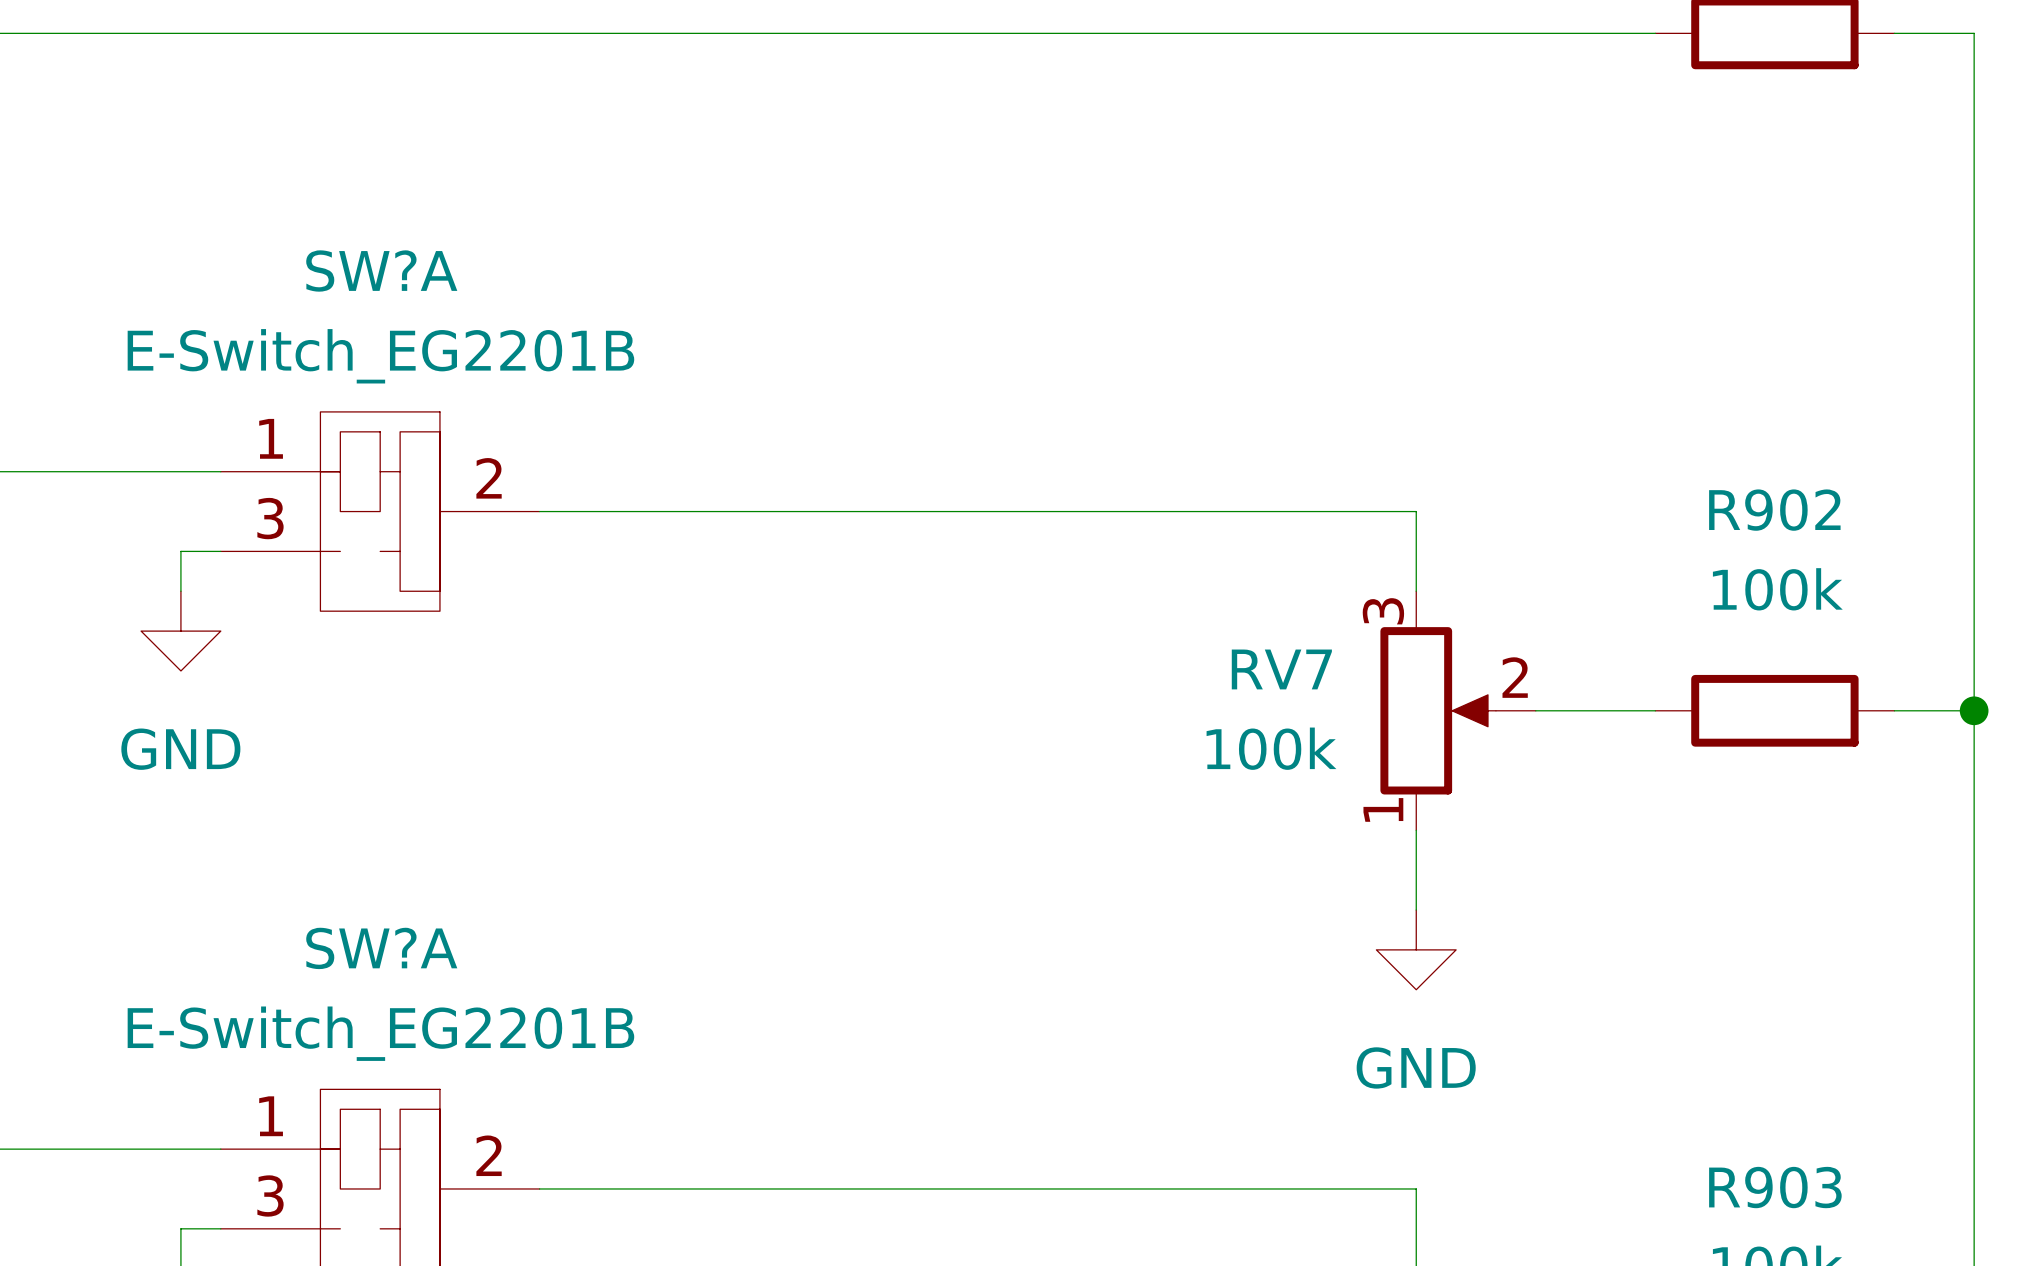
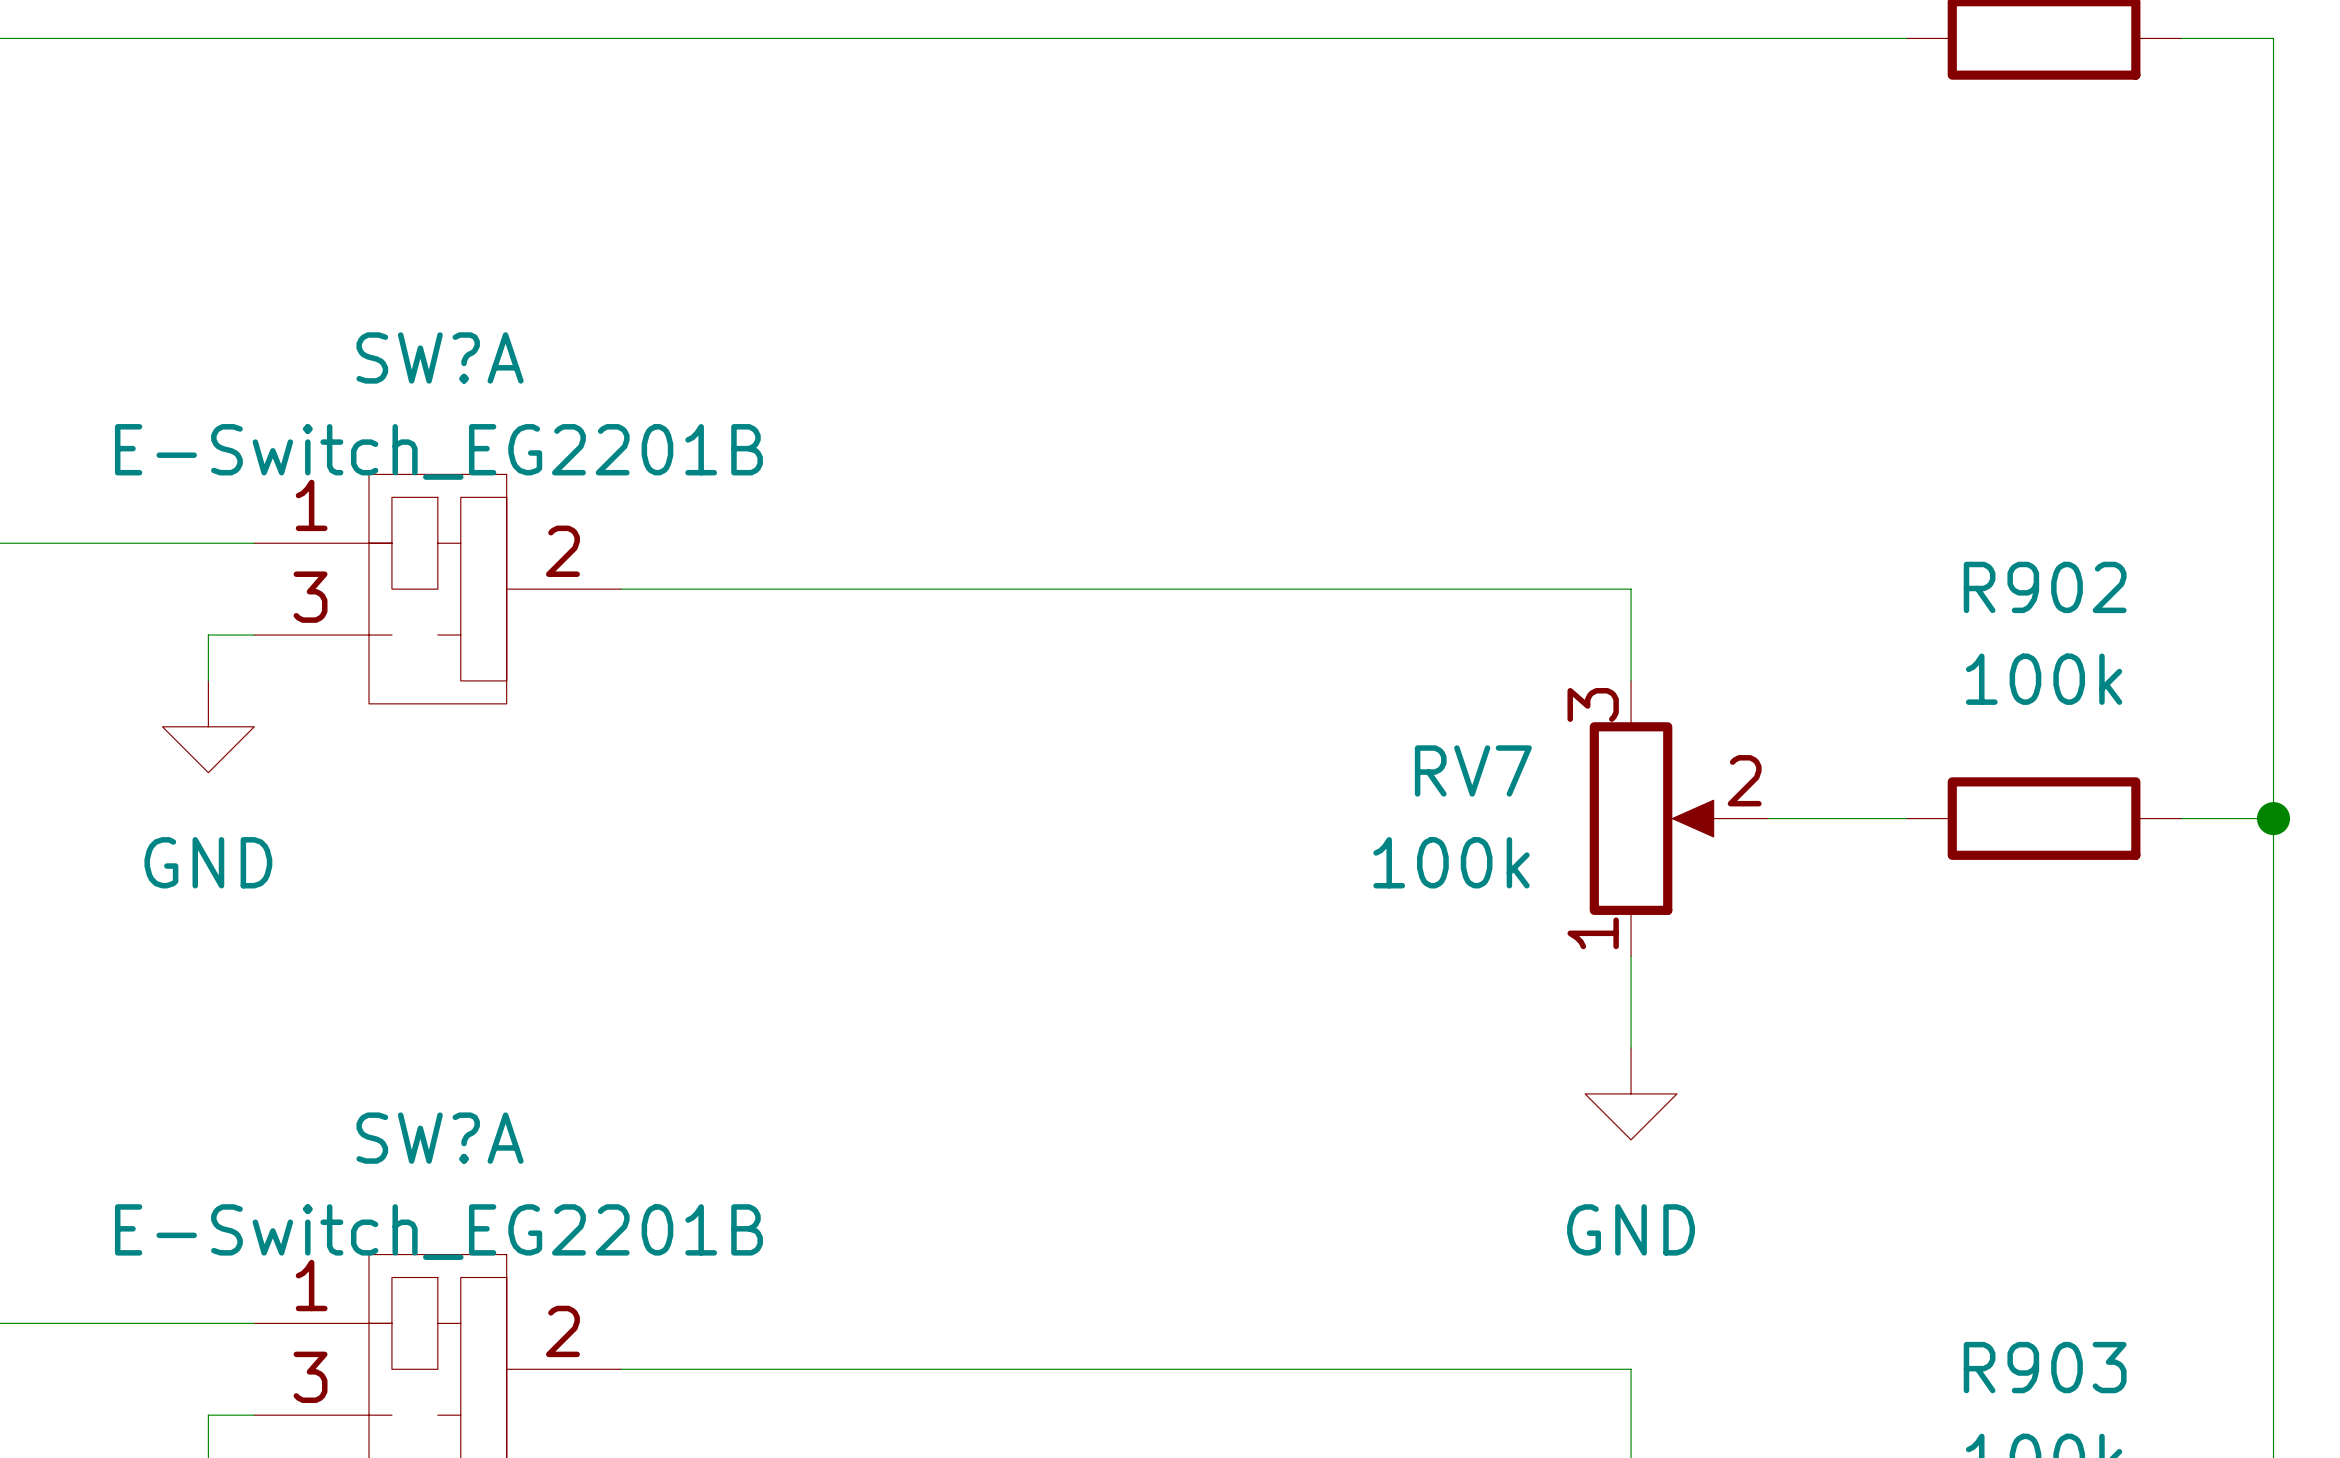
SW?A name position: SW?A (381, 271) -> SW?A (440, 357)
SW?A value position: E-Switch_EG2201B (380, 356) -> E-Switch_EG2201B (438, 451)
SW?A name position: SW?A (381, 948) -> SW?A (440, 1138)
SW?A value position: E-Switch_EG2201B (380, 1033) -> E-Switch_EG2201B (438, 1232)

